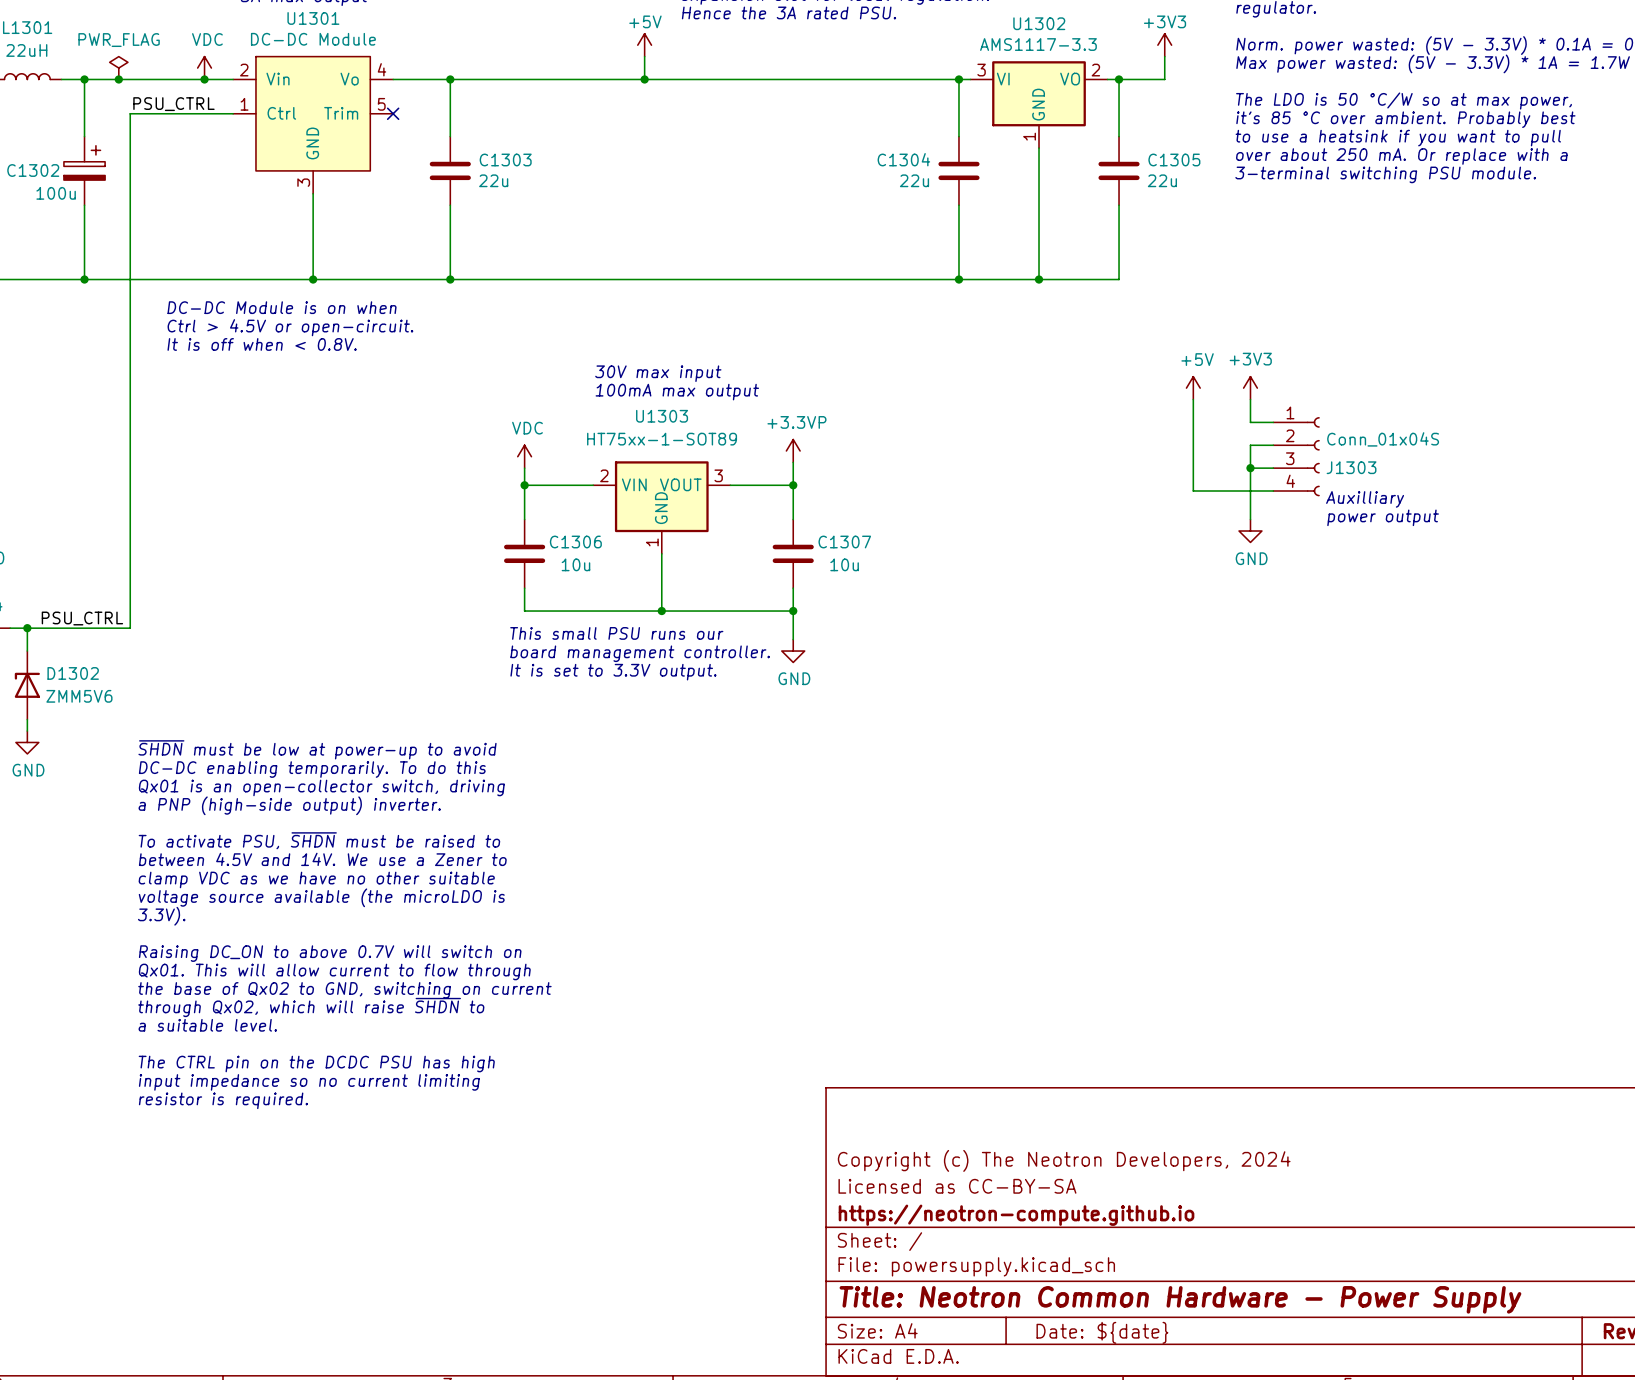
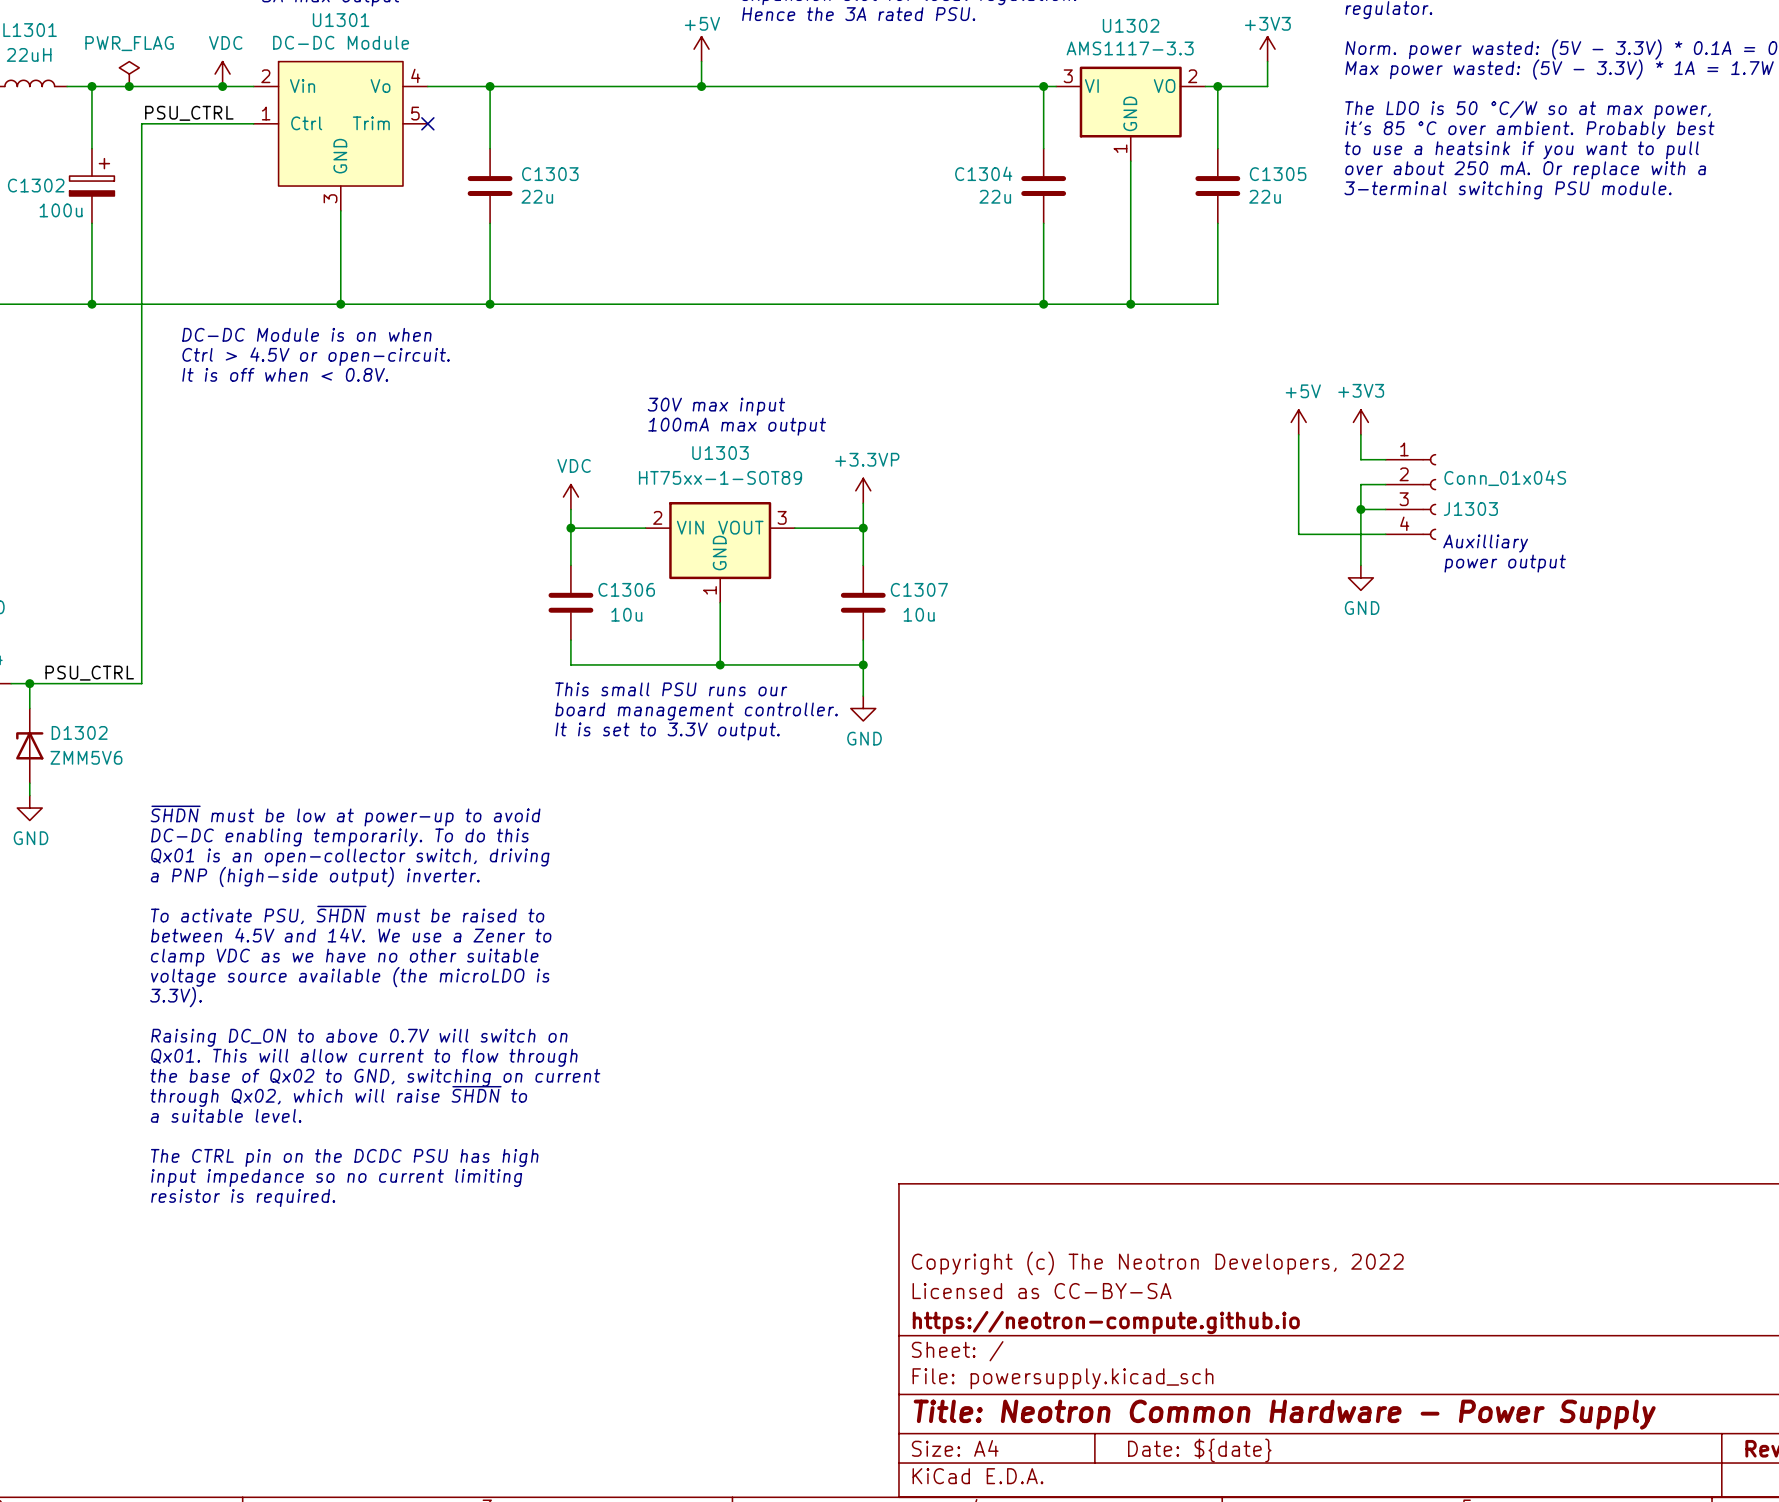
title block: Copyright (c) The Neotron Developers, 2024 (1064, 1160) -> Copyright (c) The Neotron Developers, 2022 (1157, 1263)

